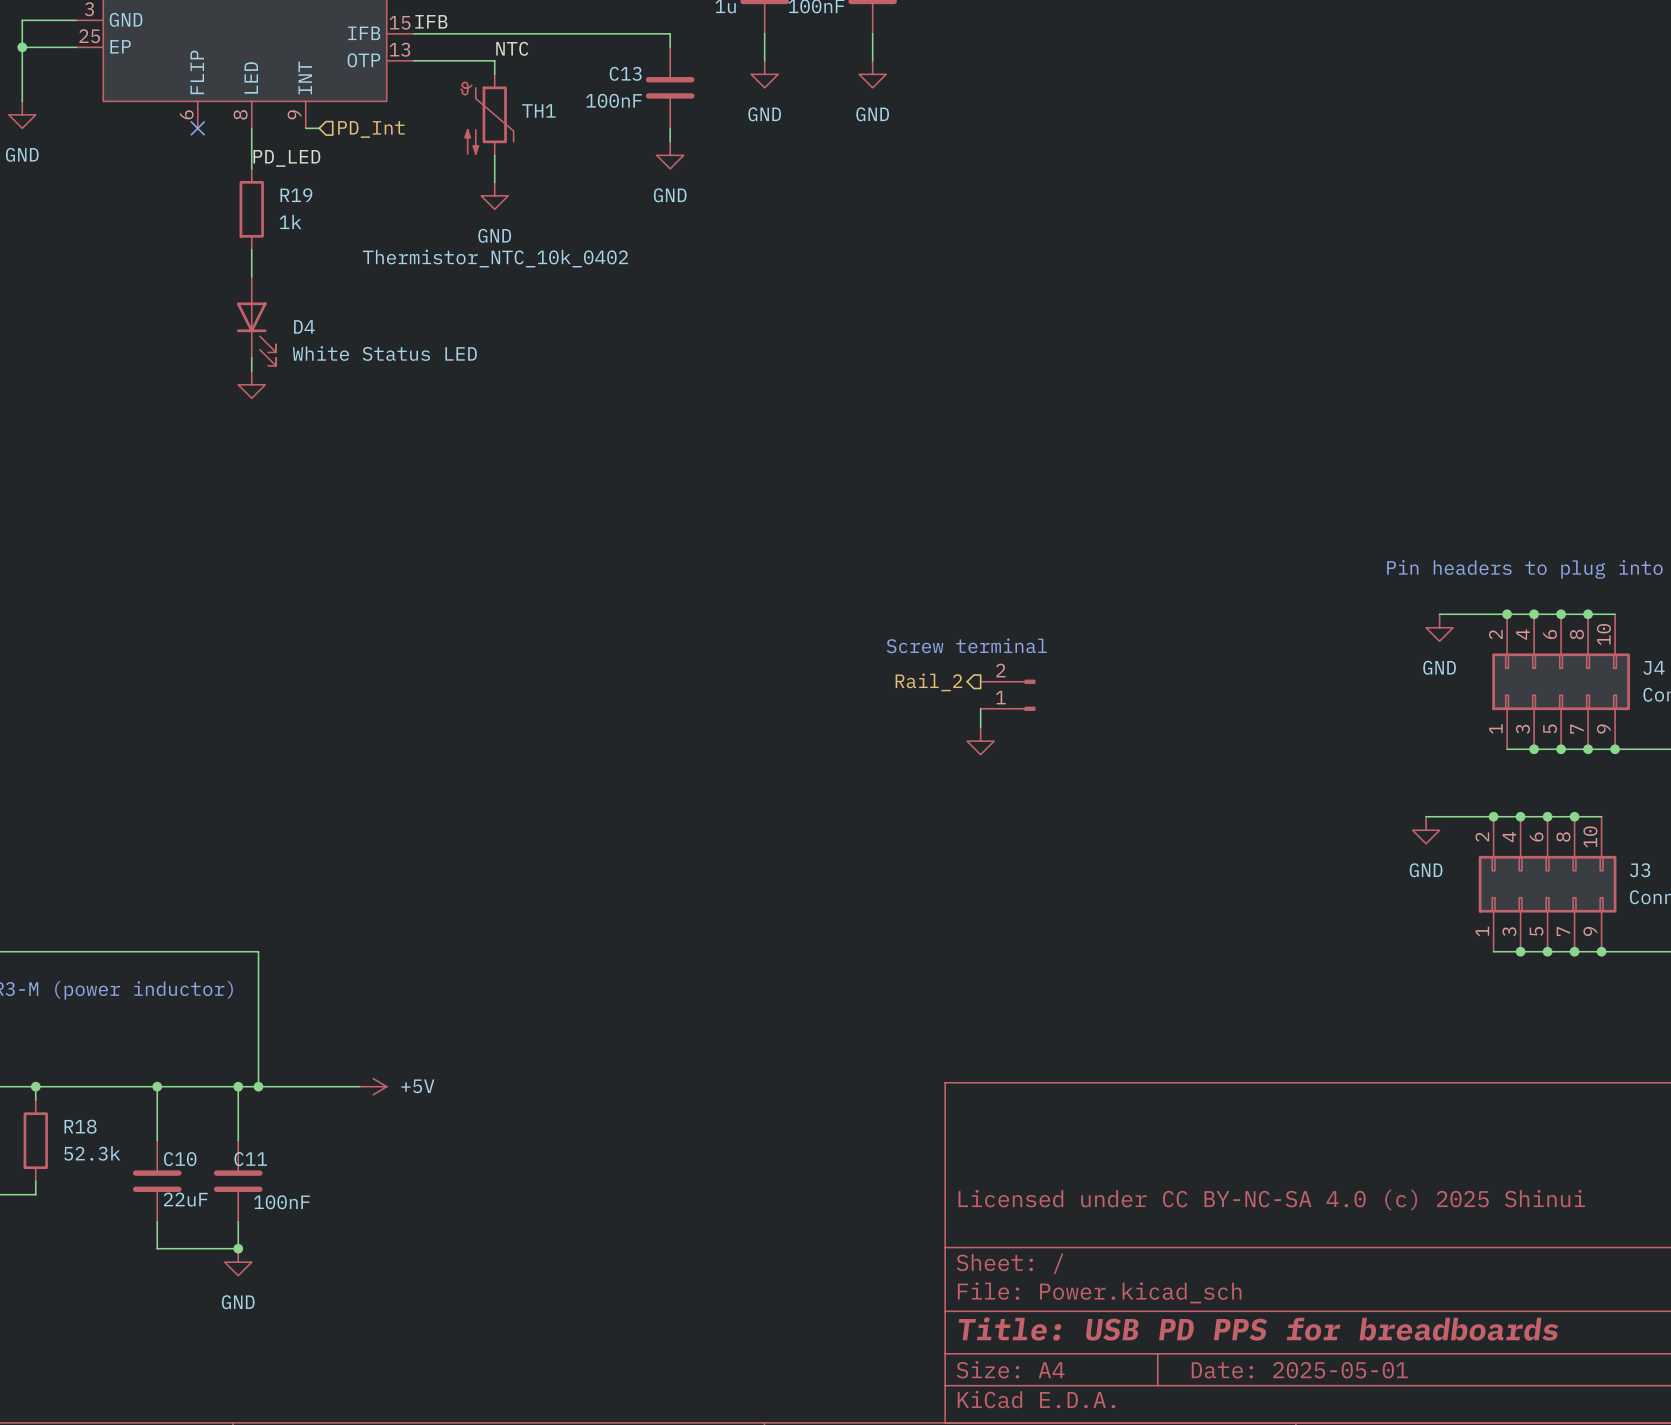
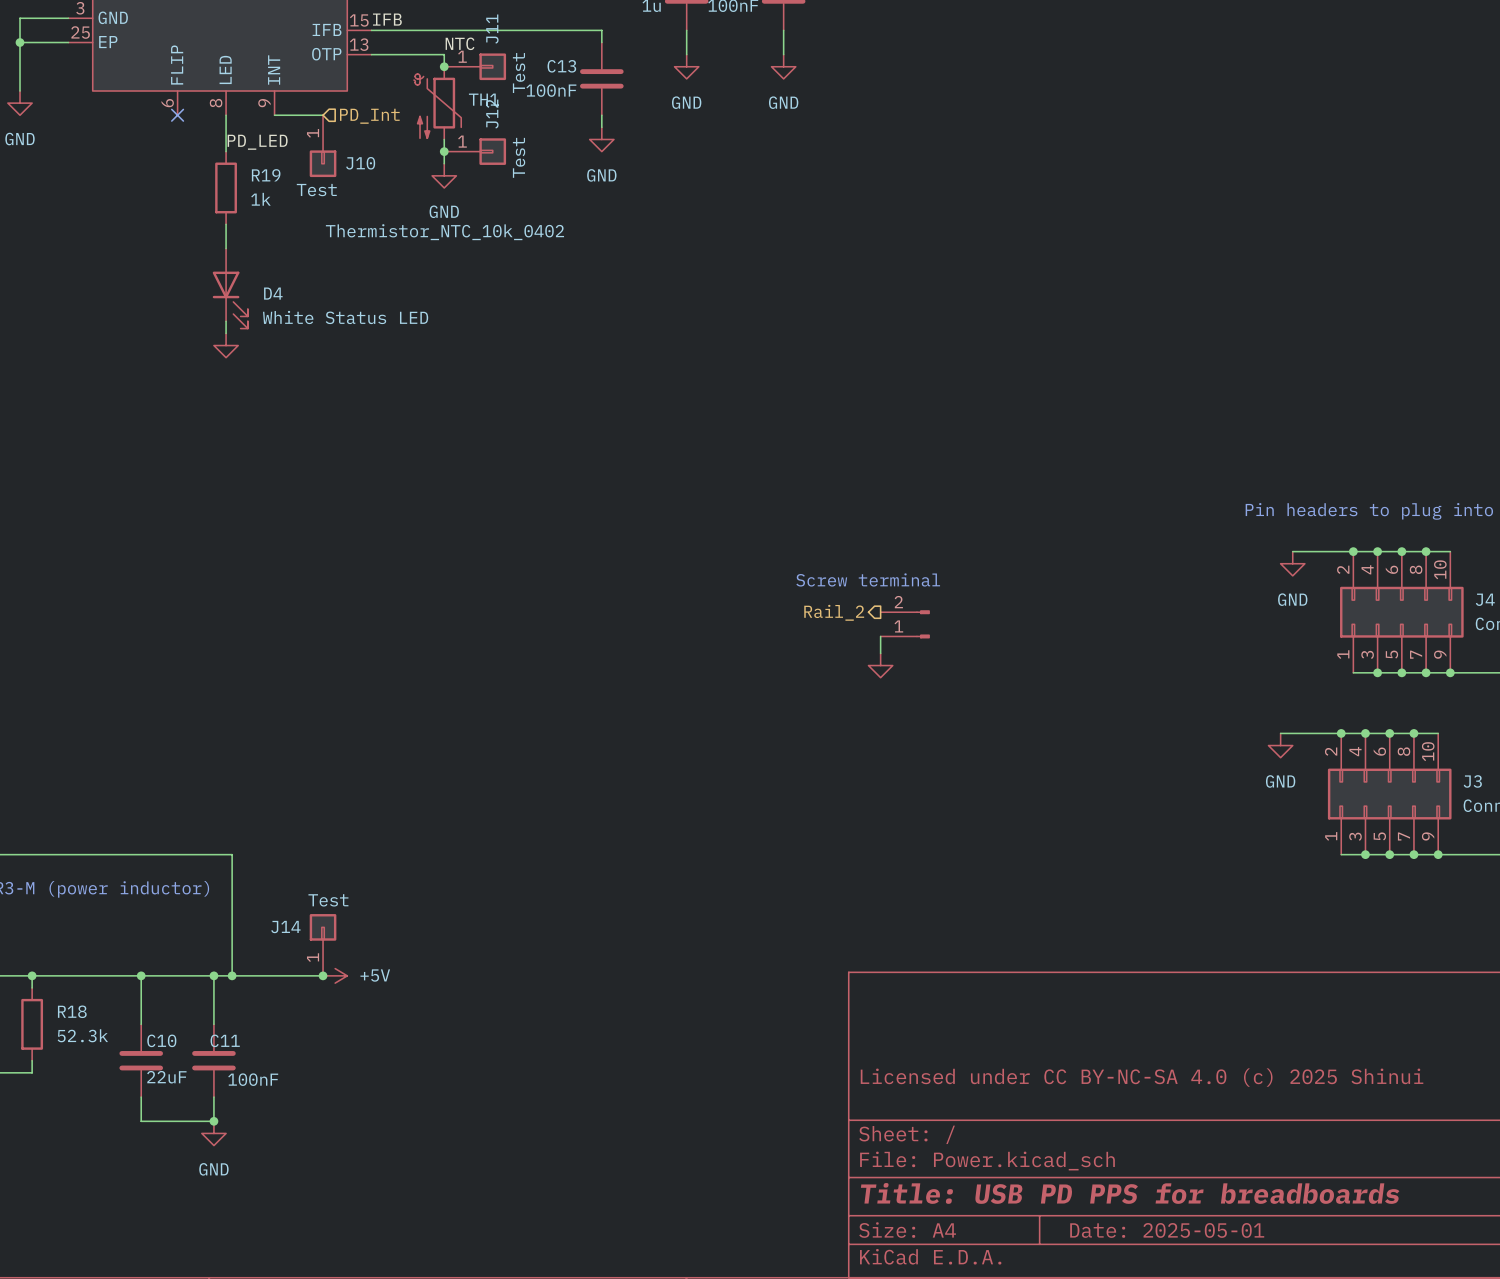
junction: none -> (444, 66)
J11: none -> Test (475, 66)
wire: none -> (286, 115) (323, 115)
hierarchical label position: PD_Int (371, 129) -> PD_Int (369, 116)
J10: none -> Test (323, 146)
junction: none -> (444, 151)
J12: none -> Test (475, 151)
J14: none -> Test (323, 944)
junction: none -> (323, 975)

